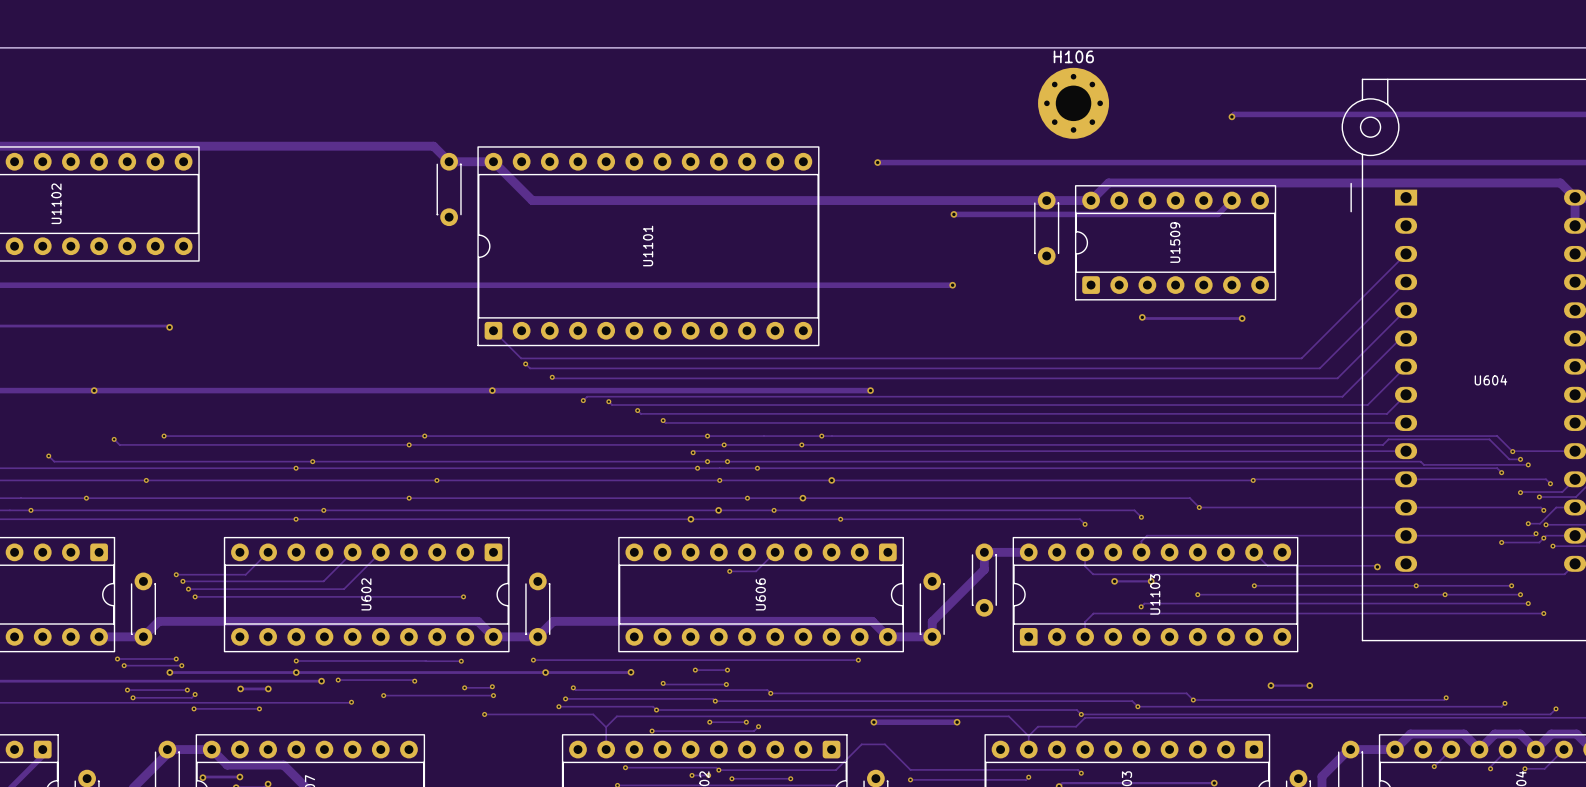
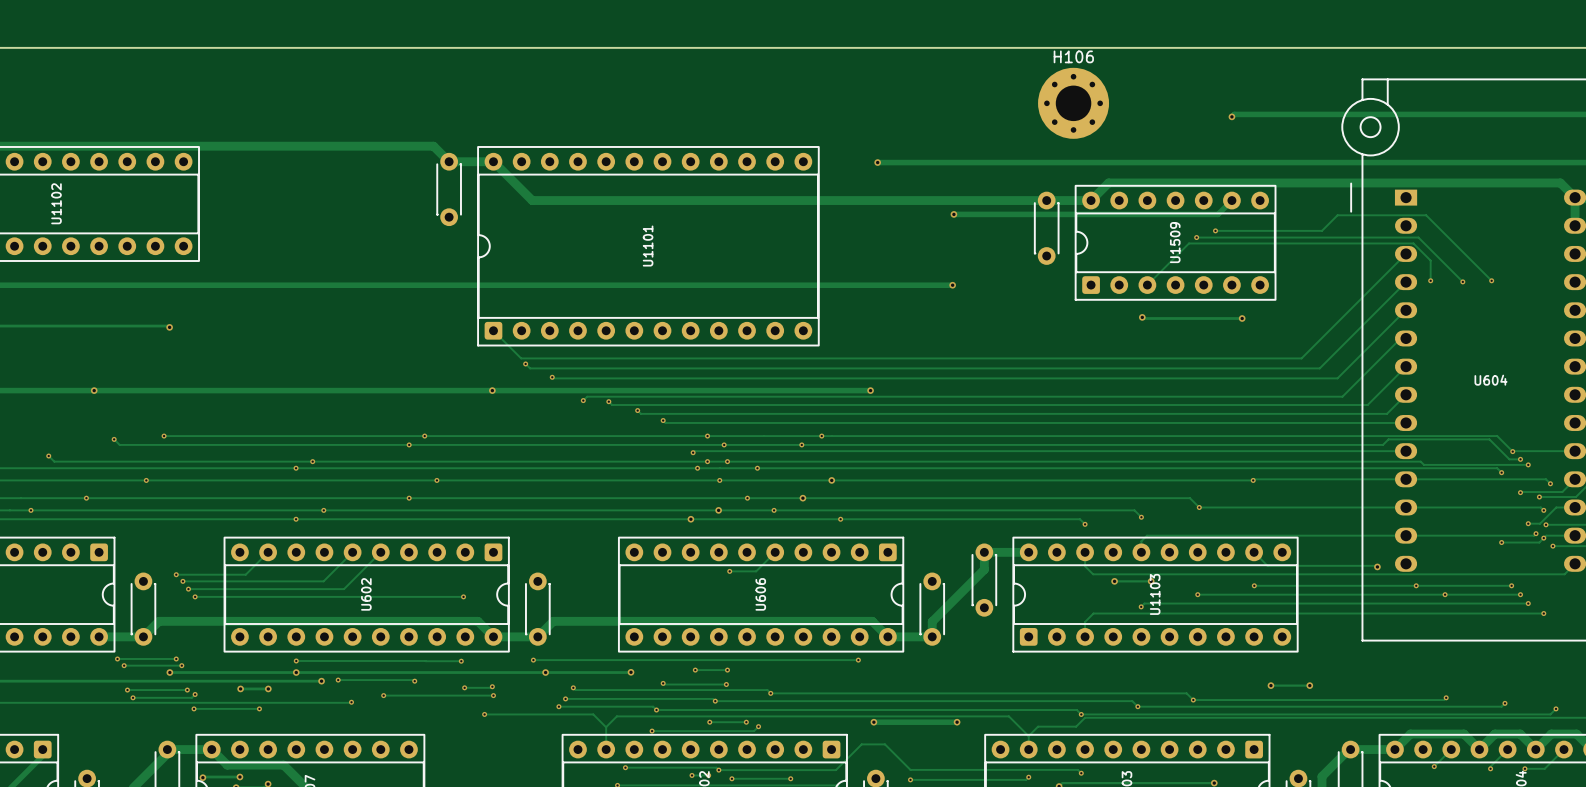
track: none -> (1215, 230) (1321, 230) (1337, 215) (1426, 215) (1491, 280)
via: none -> (1215, 230)
track: none -> (1196, 237) (1418, 237) (1462, 281)
via: none -> (1196, 237)
track: none -> (1430, 280) (1430, 260) (1413, 243) (1189, 243) (1147, 285)
via: none -> (1430, 280)
via: none -> (1491, 280)
via: none -> (1462, 281)

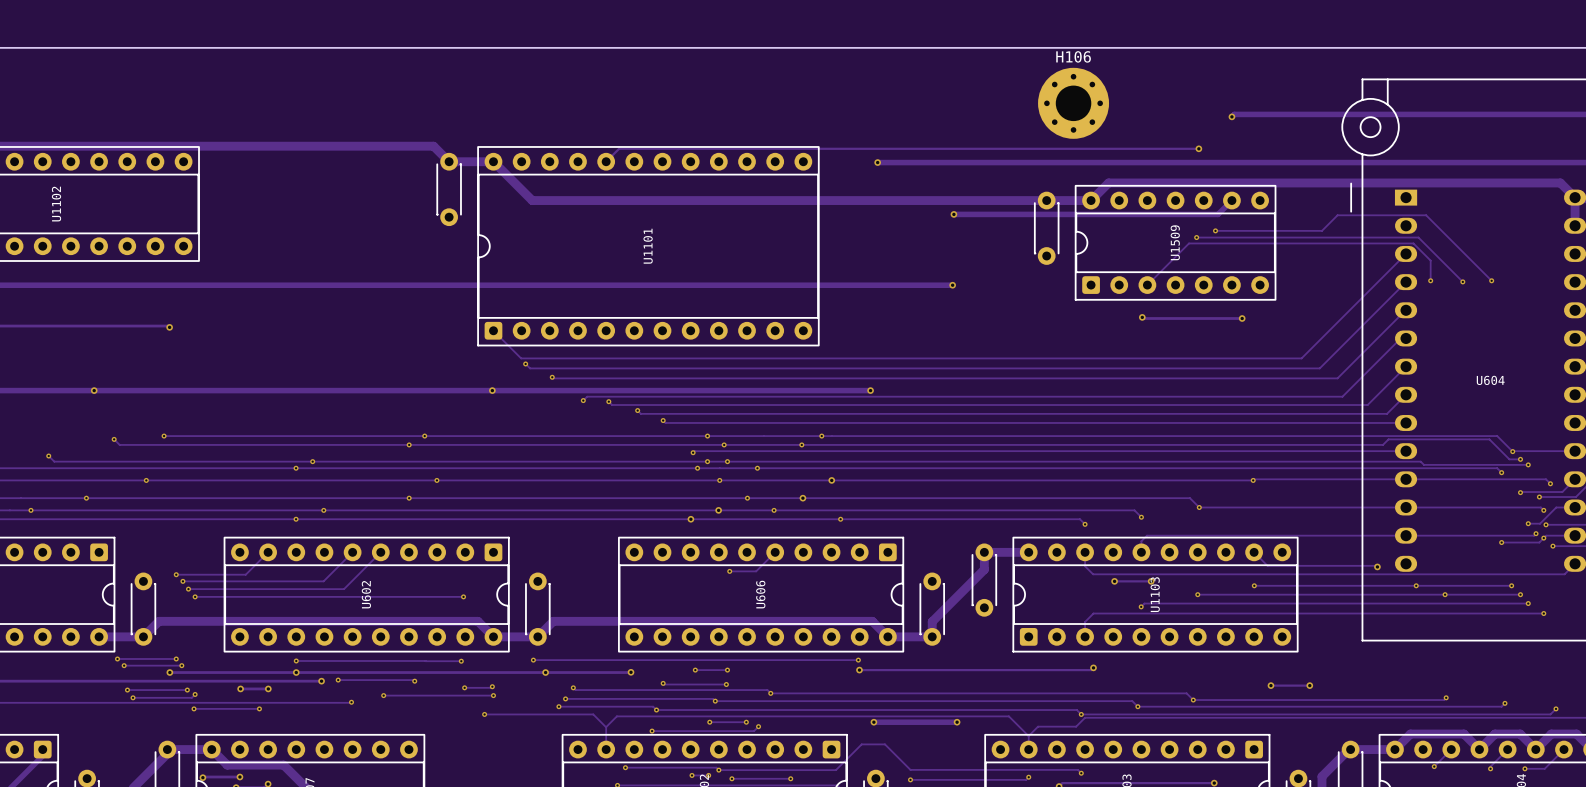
track: none -> (1198, 148) (619, 148) (606, 161)
via: none -> (1198, 148)
track: none -> (1093, 667) (1091, 670) (859, 670)
via: none -> (1093, 667)
via: none -> (859, 670)

